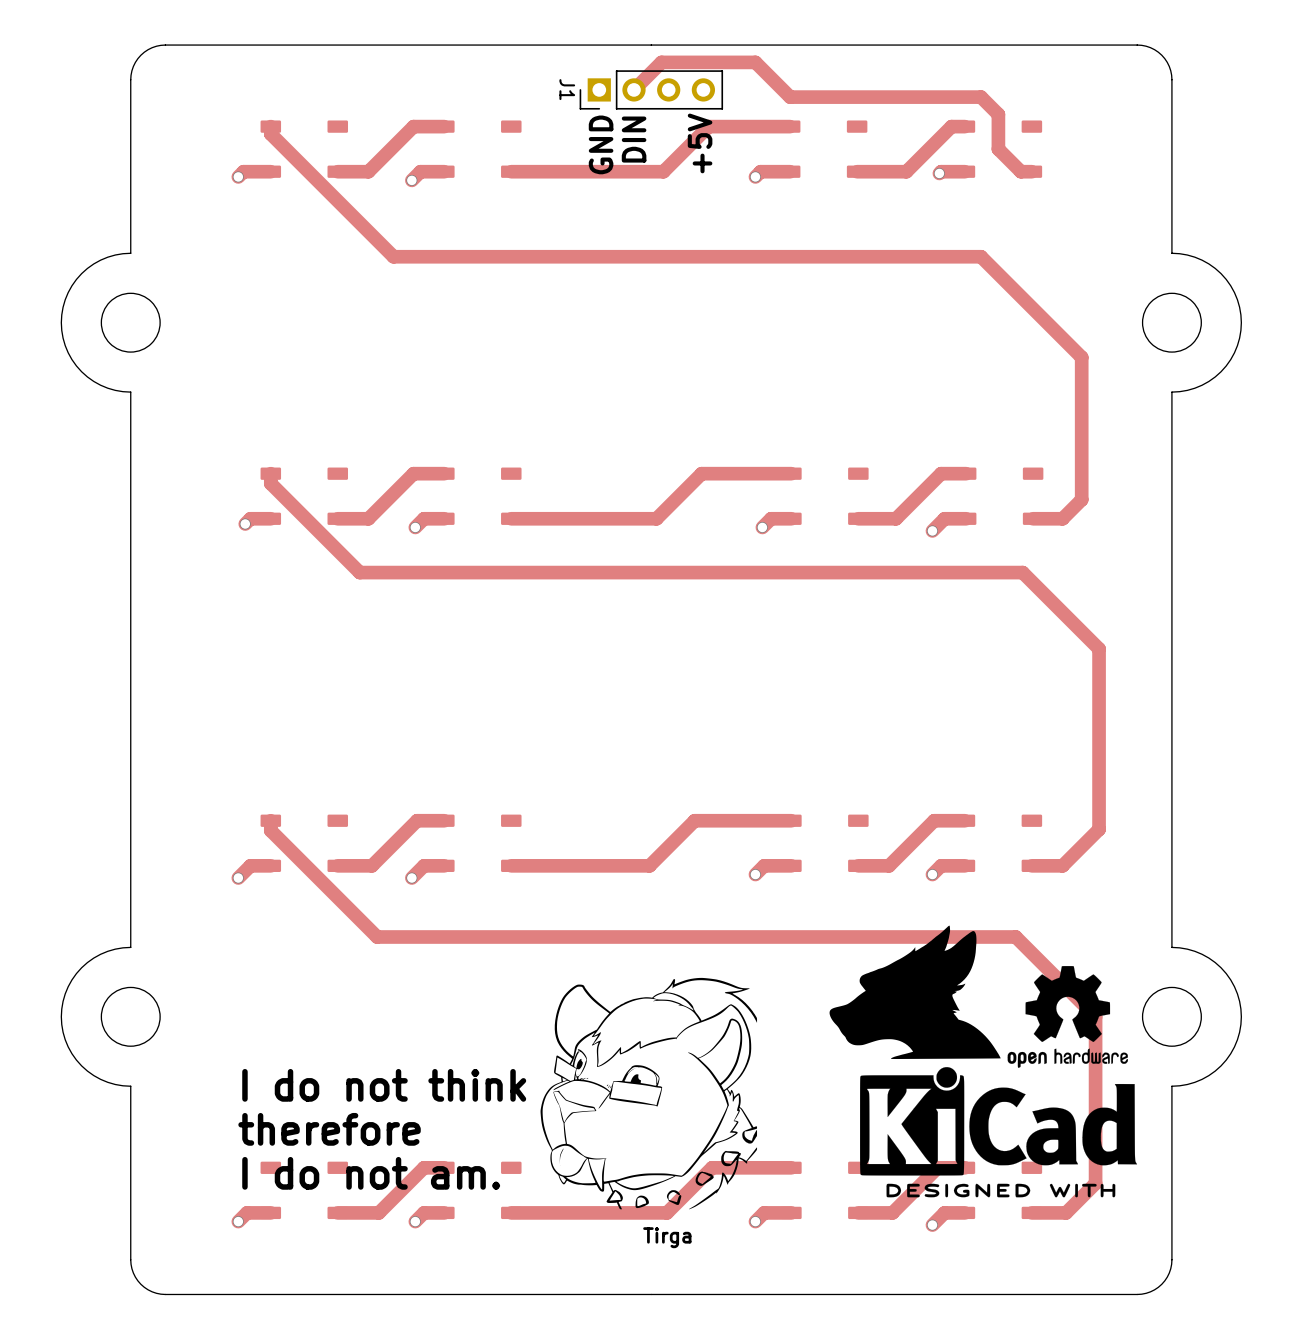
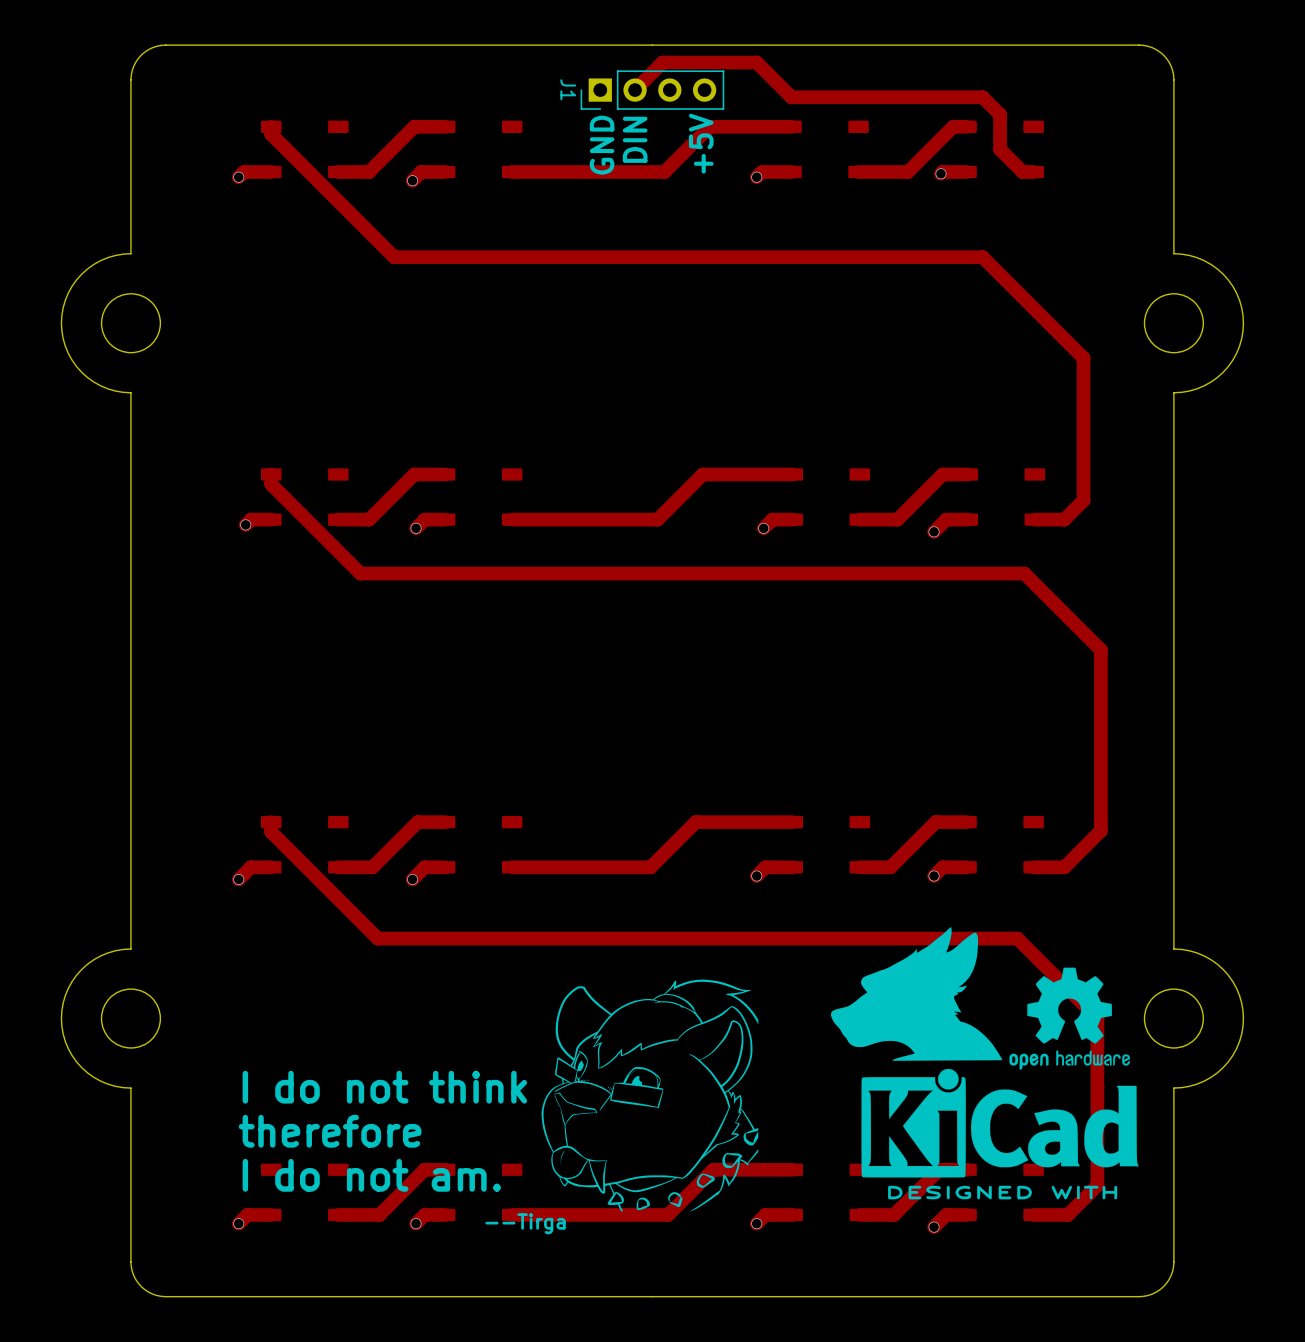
text: none -> --Tirga (525, 1223)
text: Tirga (667, 1237) -> none

